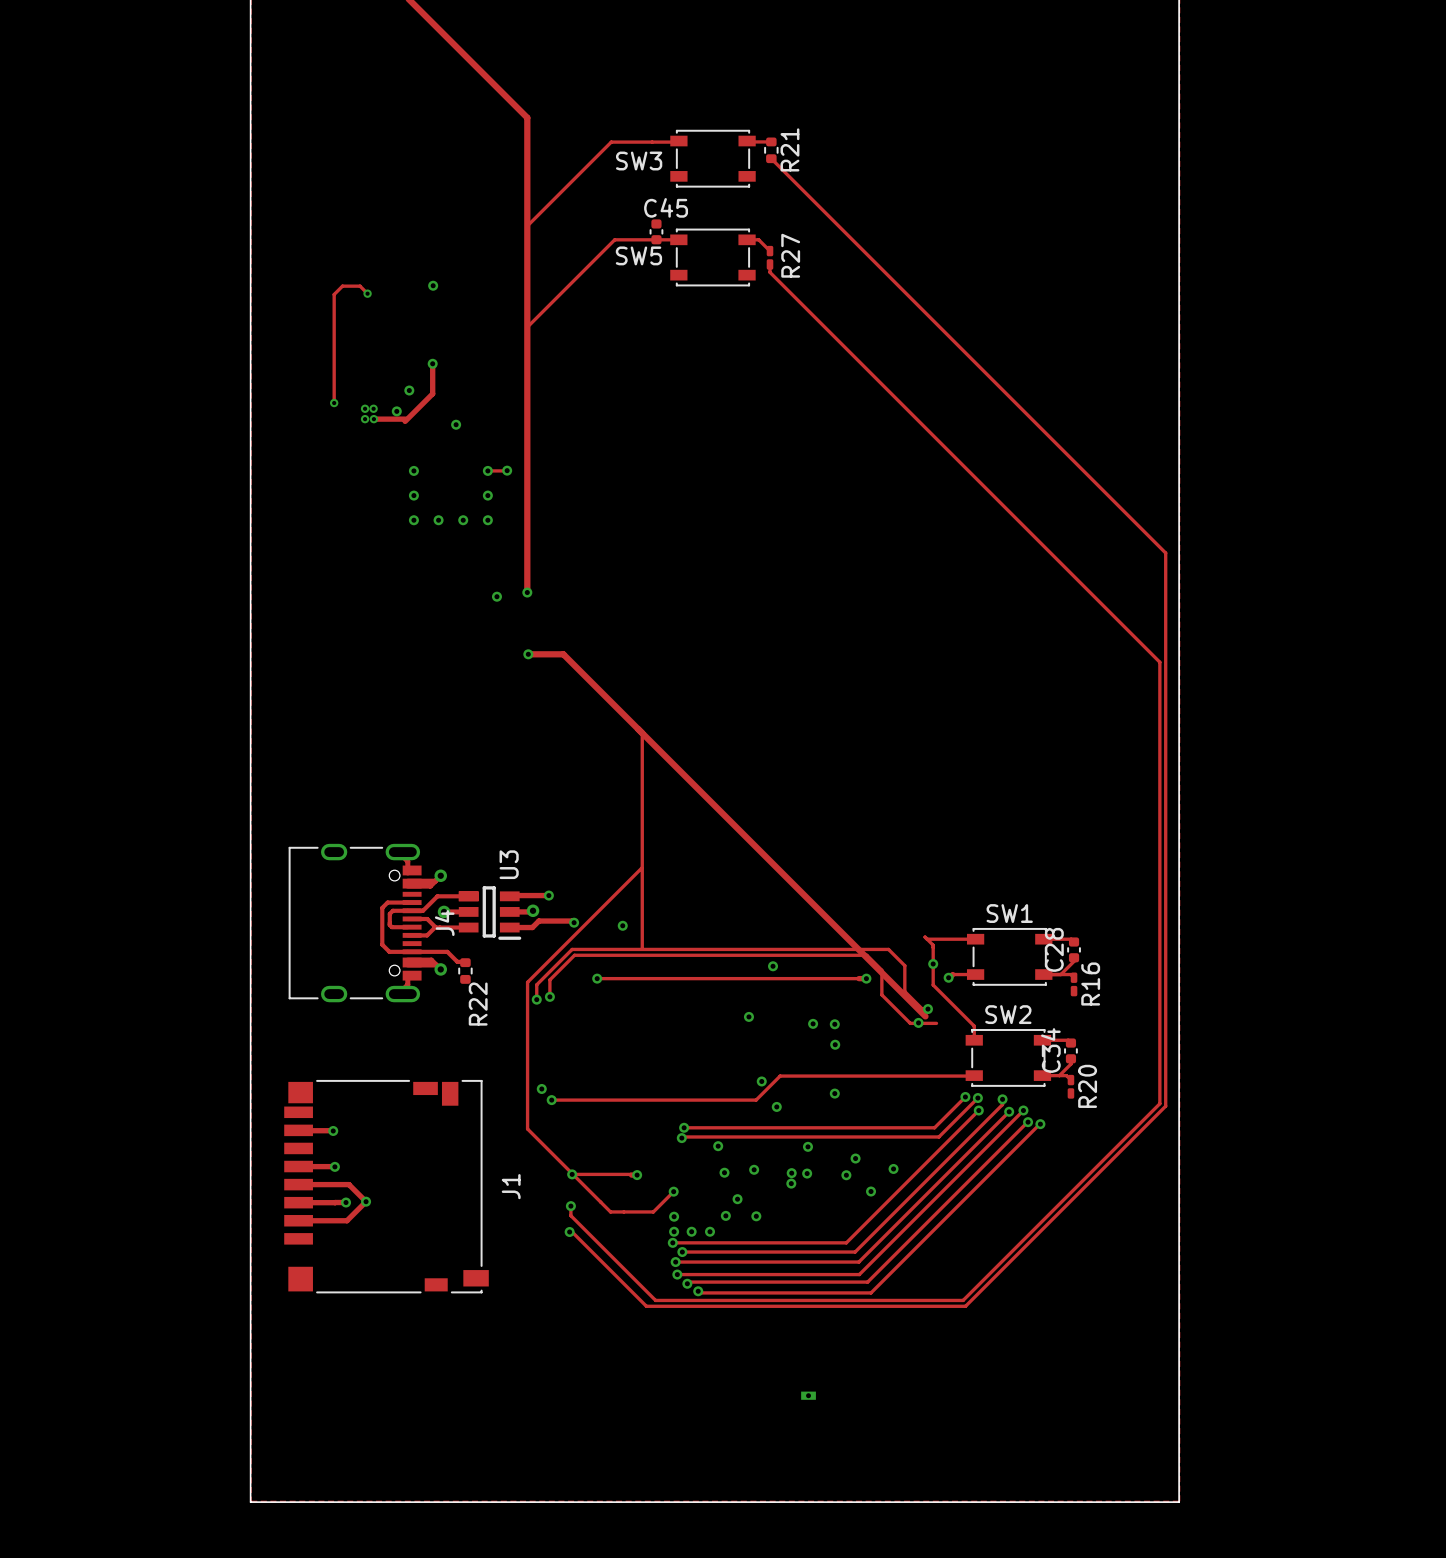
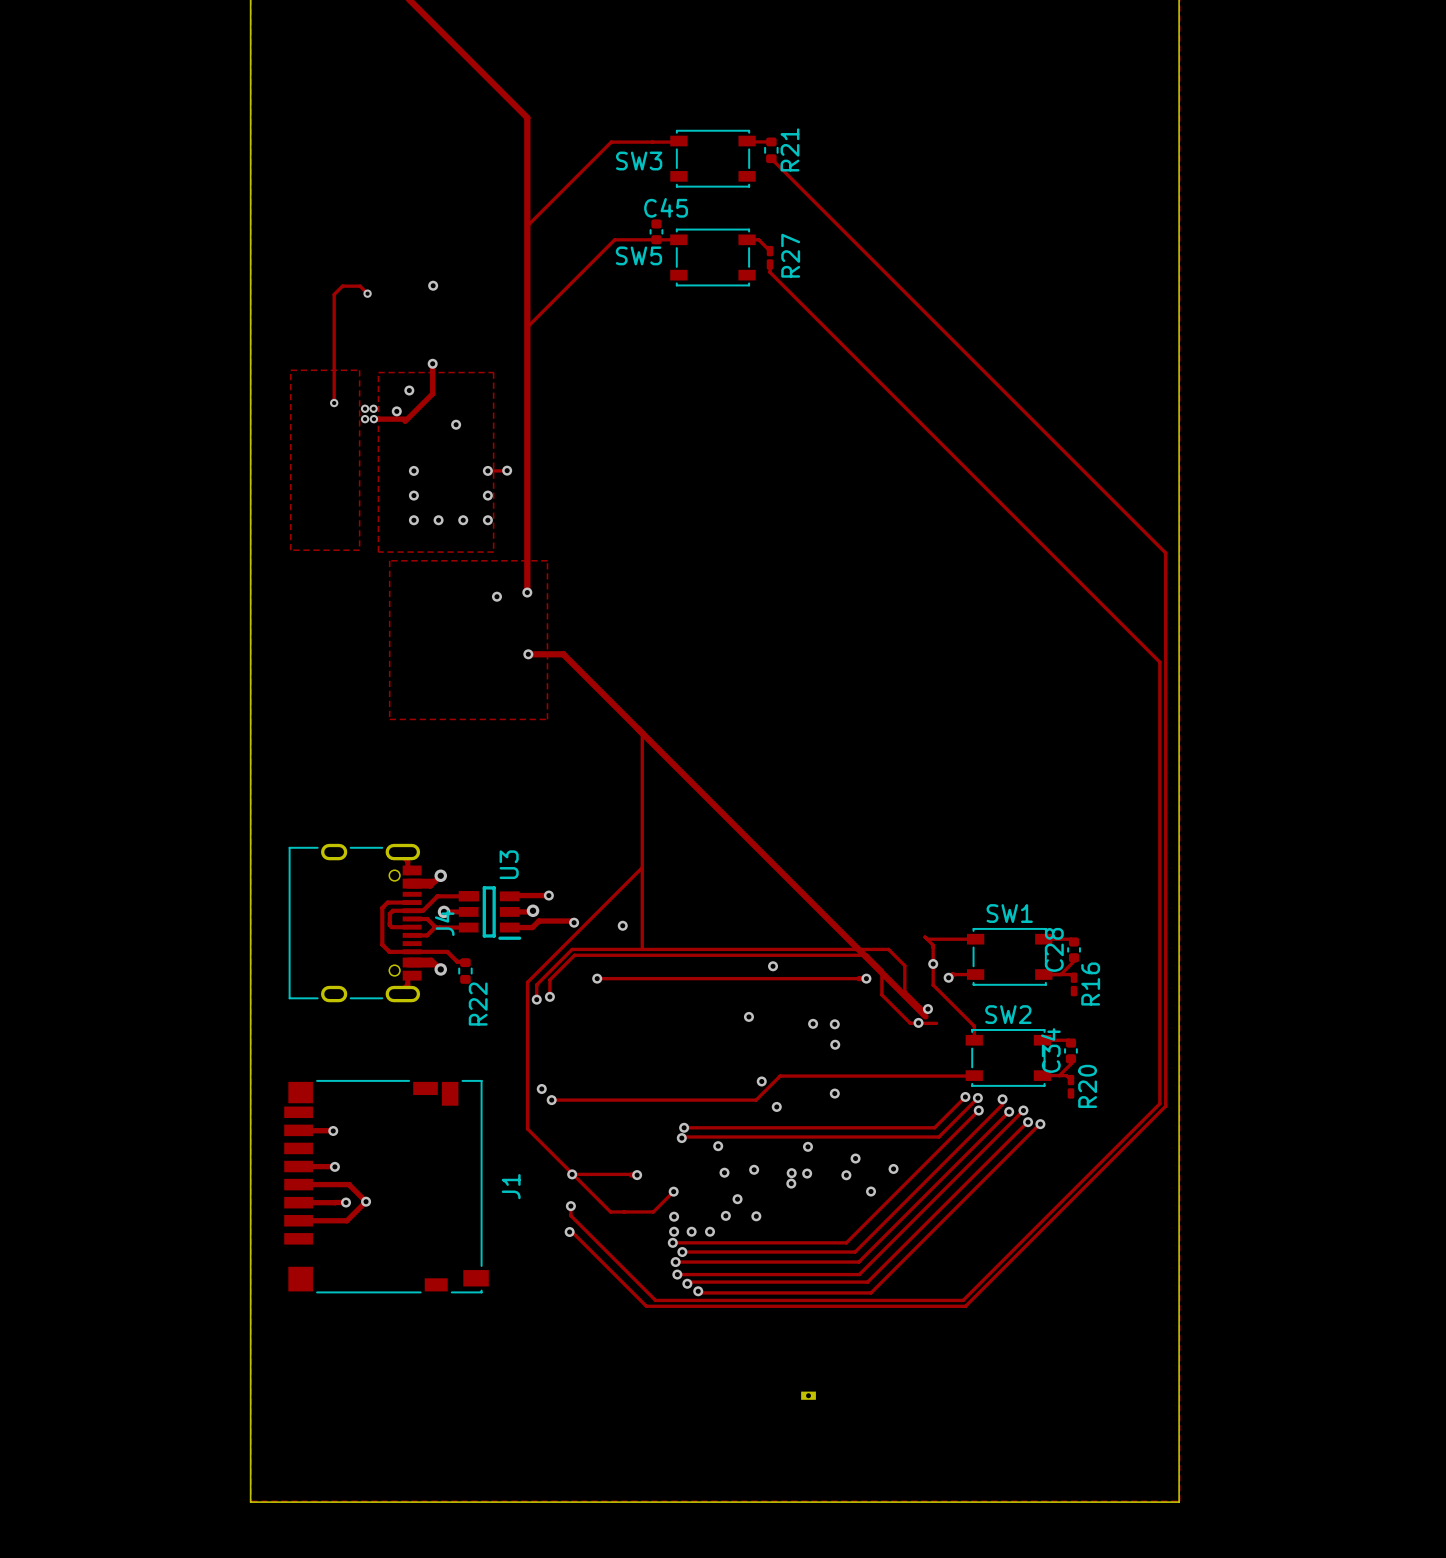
zone outline: none -> (290, 370) (290, 550) (359, 550) (359, 370) (290, 370)
zone outline: none -> (378, 372) (378, 552) (493, 552) (493, 372) (378, 372)
zone outline: none -> (389, 560) (547, 560) (547, 719) (389, 719) (389, 560)

